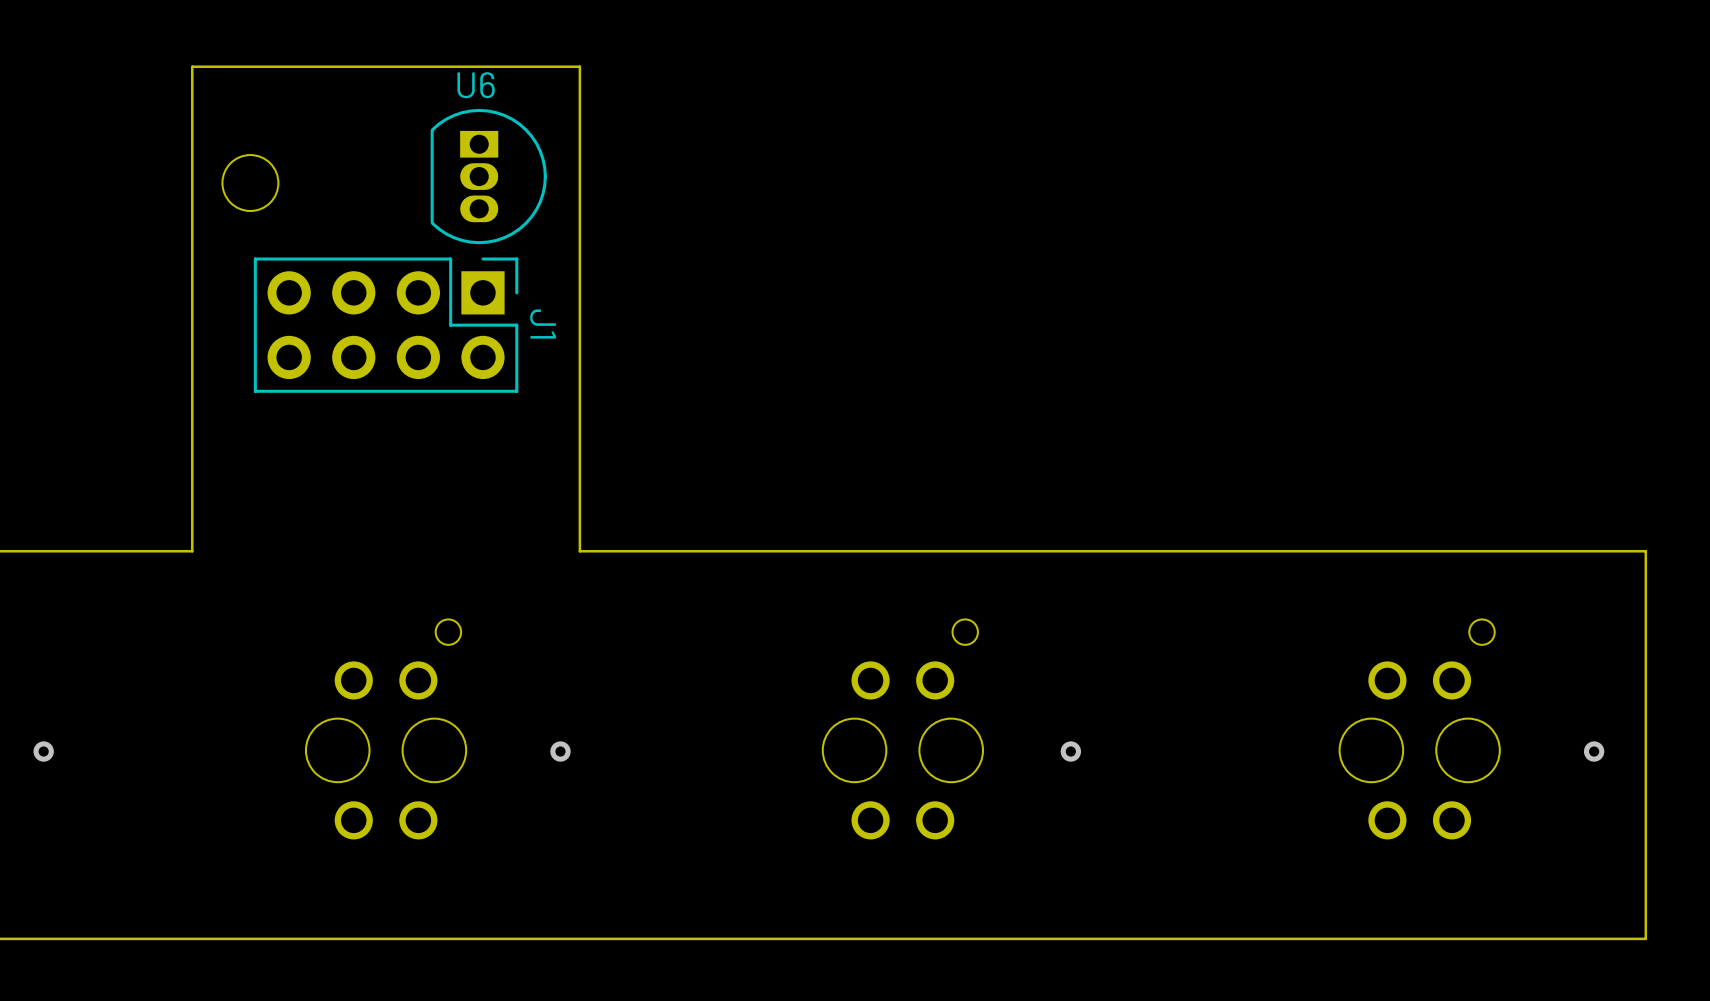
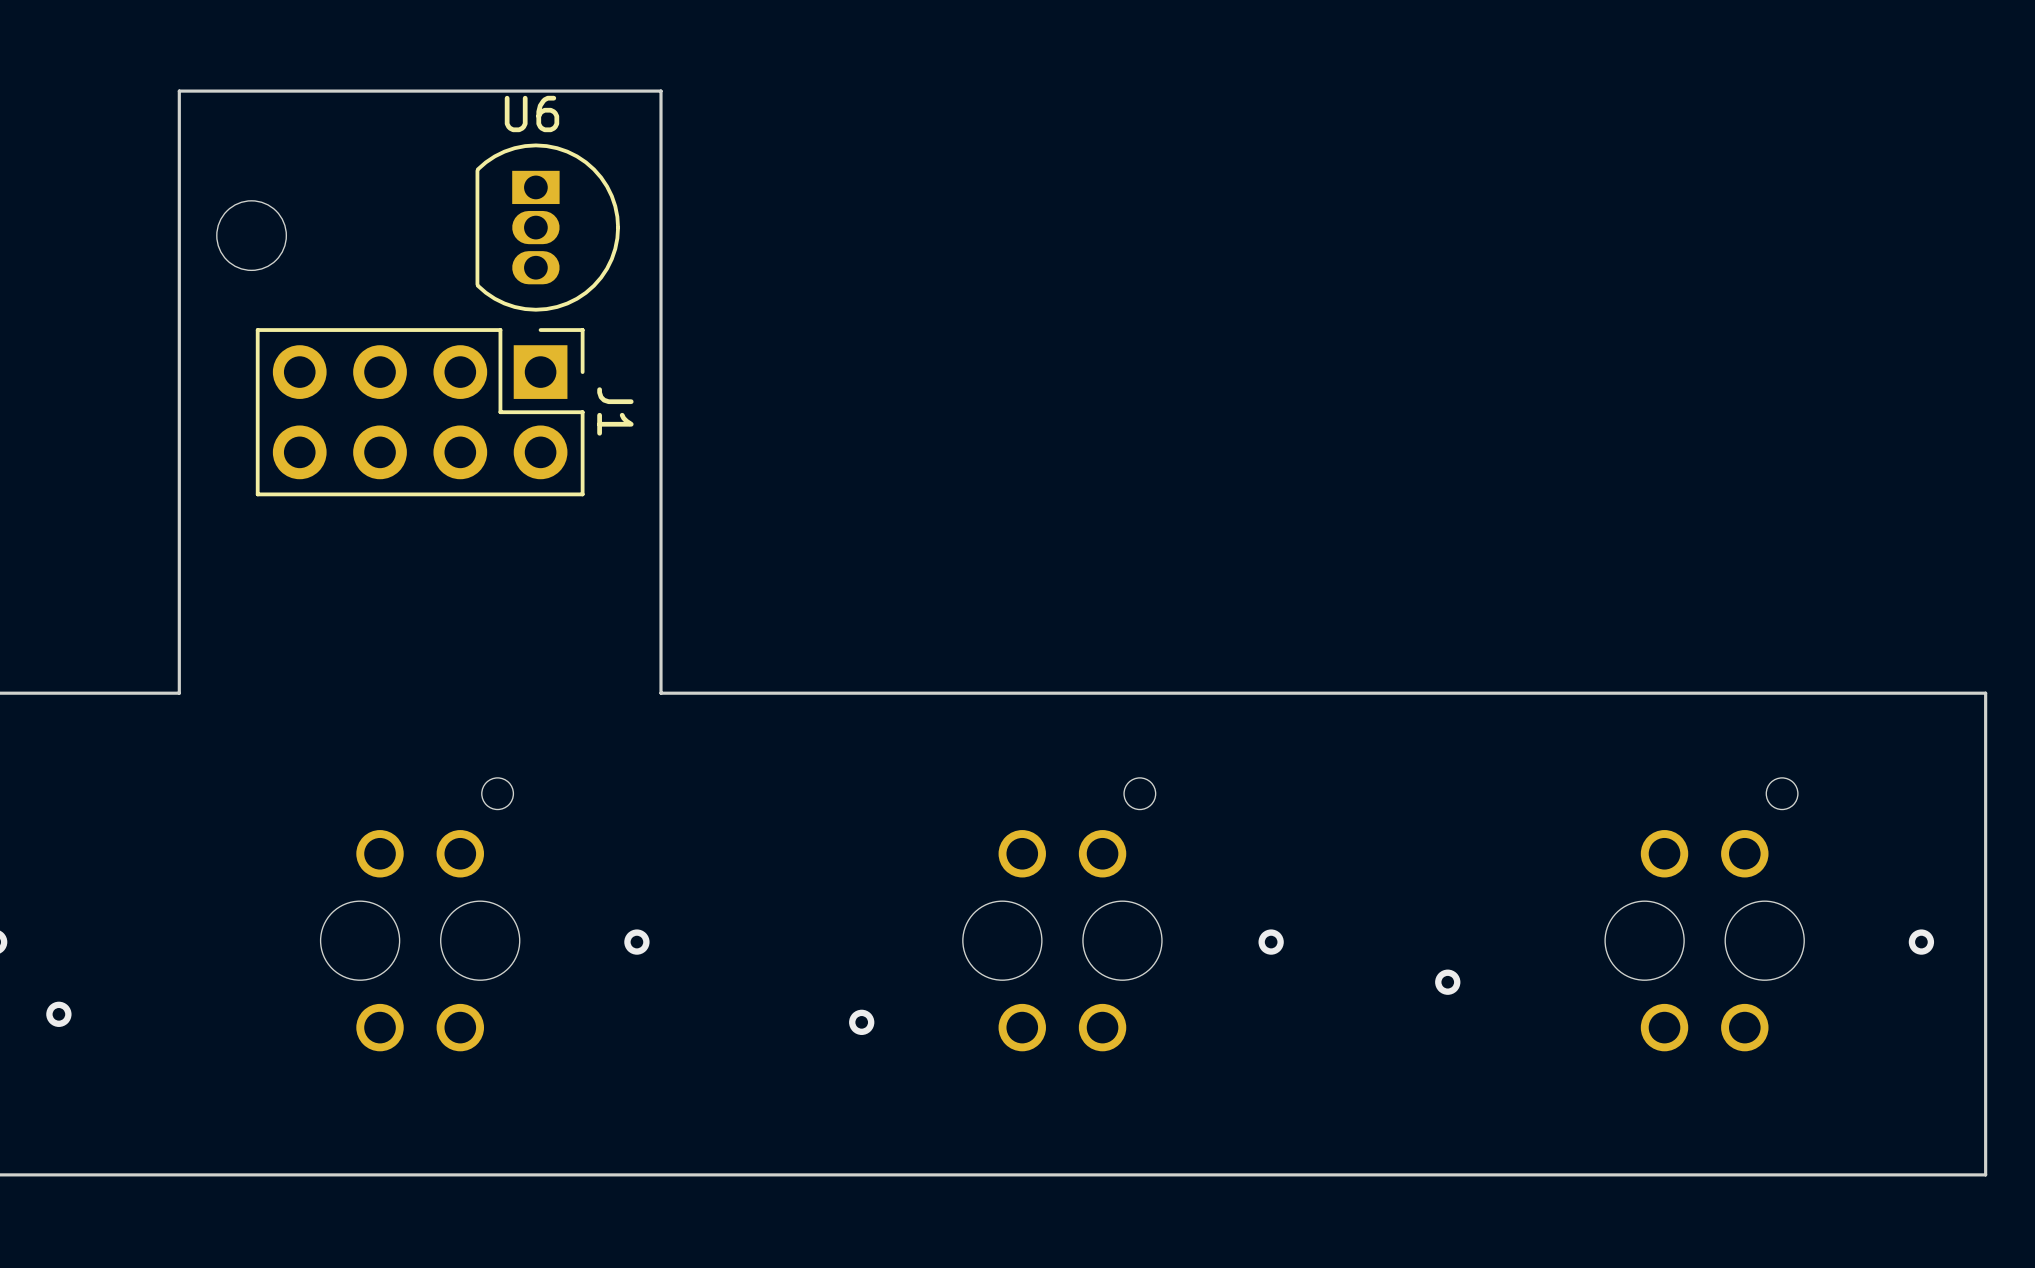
via: none -> (1447, 982)
via: none -> (58, 1014)
via: none -> (861, 1022)

